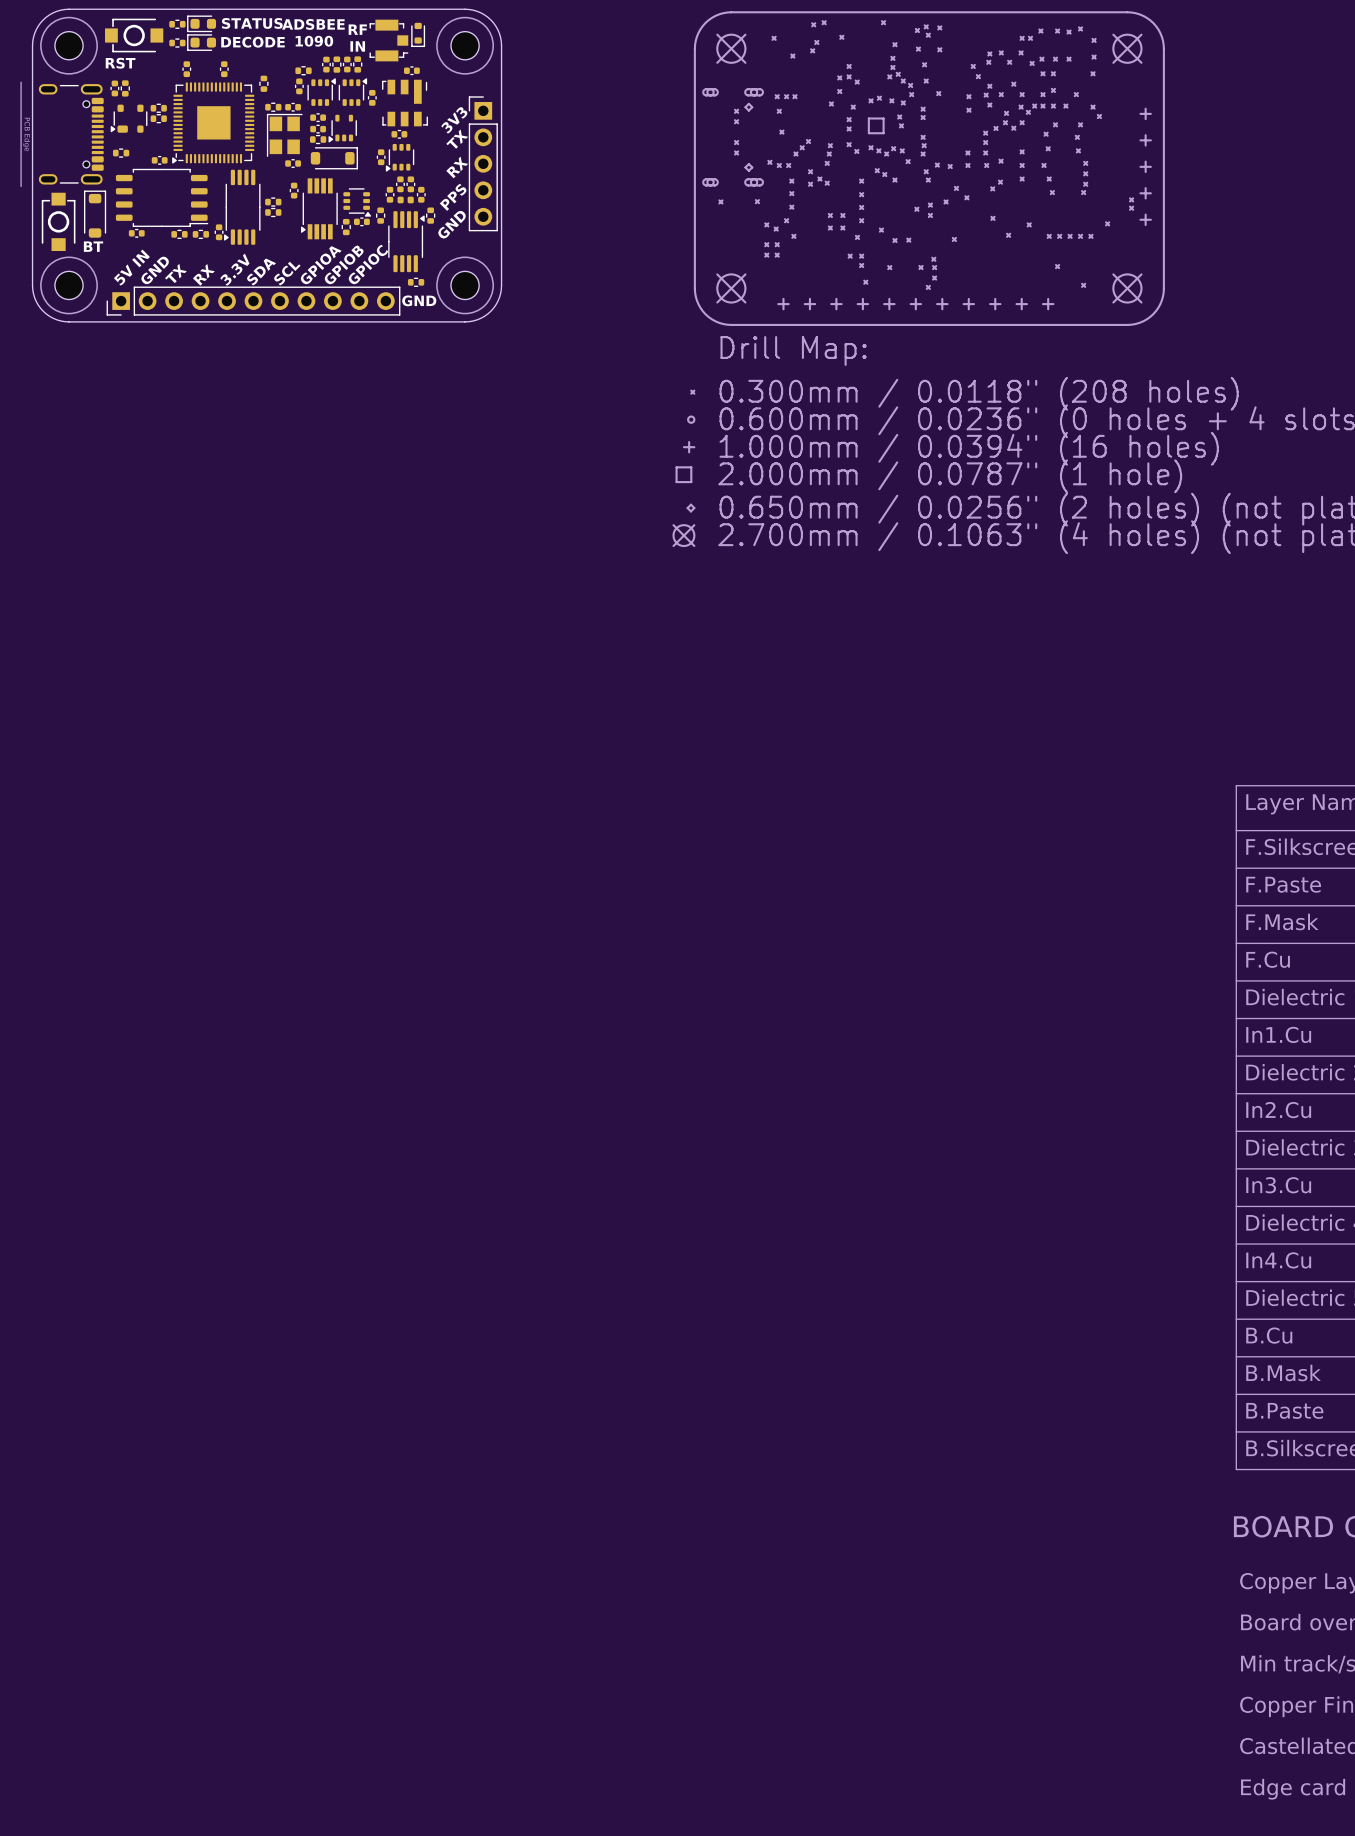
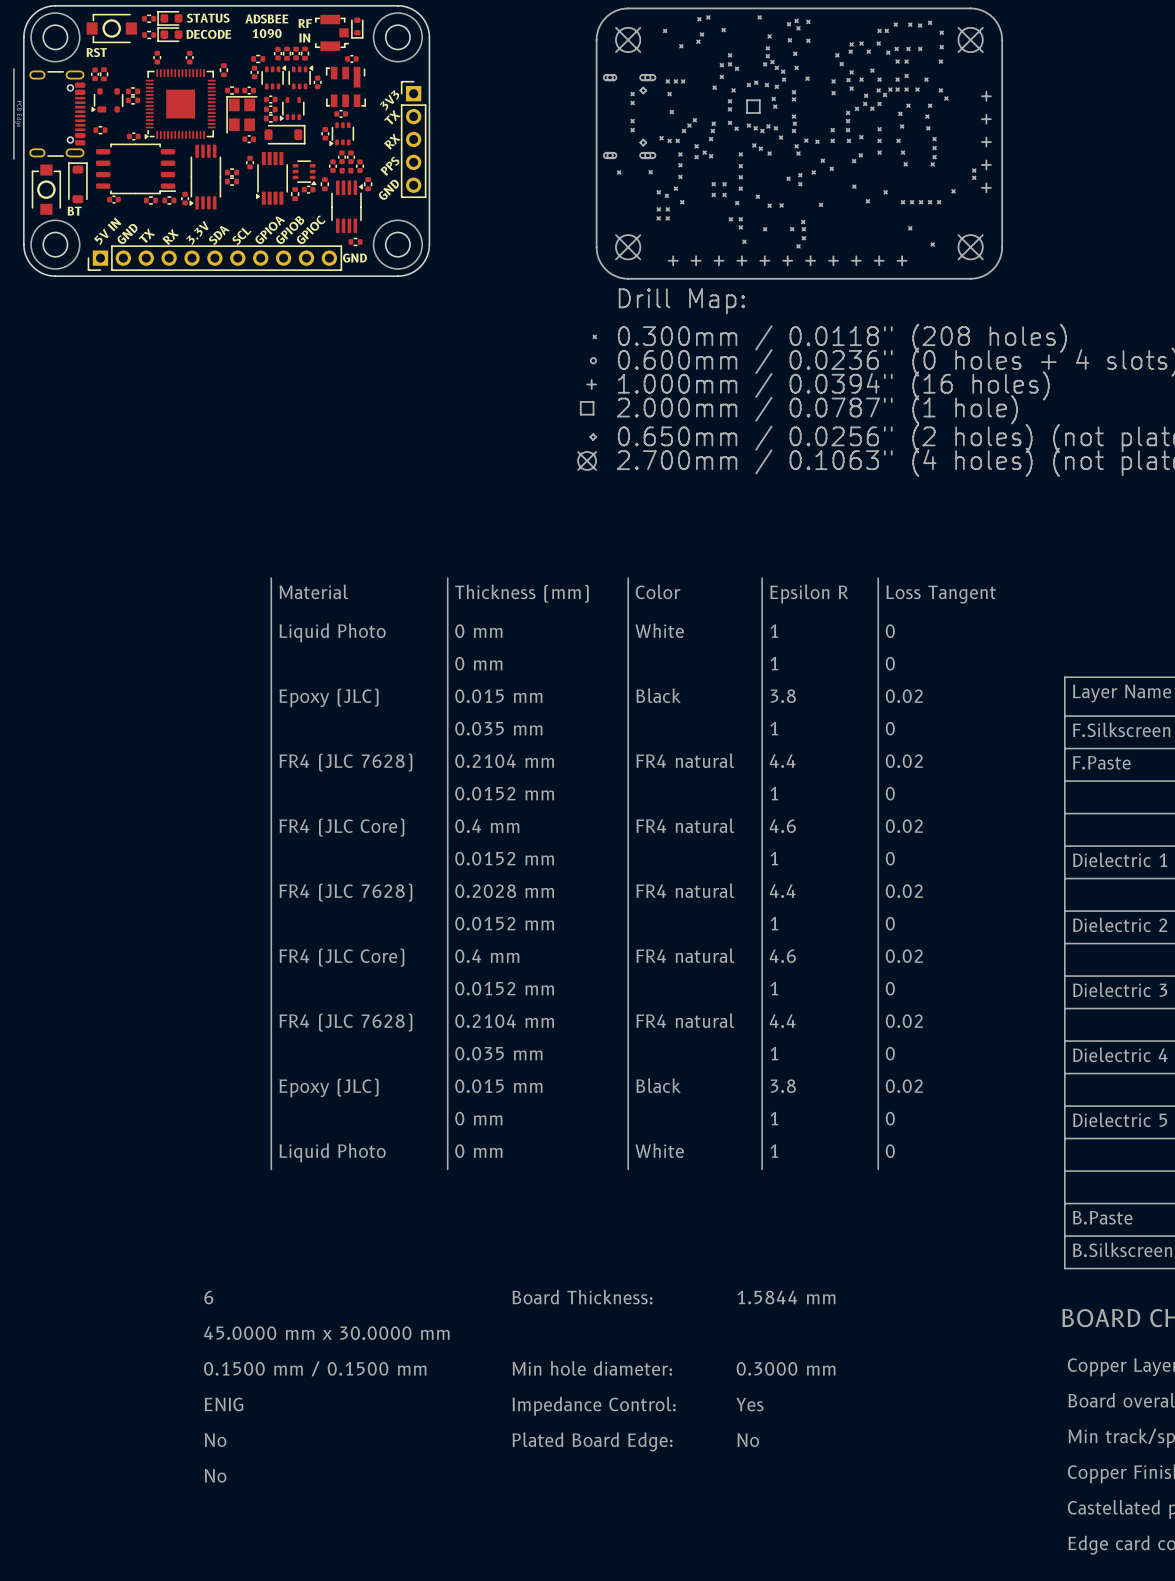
line: none -> (271, 578) (271, 1169)
line: none -> (447, 578) (447, 1169)
line: none -> (628, 578) (628, 1169)
line: none -> (762, 578) (762, 1169)
line: none -> (878, 578) (878, 1169)
text: none -> Material (313, 591)
text: none -> Color (658, 591)
text: none -> Thickness (mm) (521, 593)
text: none -> Epsilon R (809, 594)
text: none -> Loss Tangent (941, 594)
text: none -> 0 mm (478, 631)
text: none -> White (659, 630)
text: none -> 1 (774, 631)
text: none -> 0 (890, 631)
text: none -> Liquid Photo (332, 632)
text: none -> 0 mm (478, 663)
text: none -> 1 (774, 663)
text: none -> 0 (890, 663)
text: none -> 0.015 mm (498, 696)
text: none -> Black (658, 695)
text: none -> 3.8 (783, 696)
text: none -> 0.02 (904, 696)
text: none -> Epoxy (JLC) (329, 697)
text: none -> 0.035 mm (498, 728)
text: none -> 1 (774, 728)
text: none -> 0 (890, 728)
text: none -> 0.2104 mm (504, 761)
text: none -> FR4 natural (685, 760)
text: none -> 4.4 (782, 761)
text: none -> 0.02 (904, 761)
text: none -> FR4 (JLC 7628) (345, 762)
text: none -> 0.0152 mm (504, 793)
text: none -> 1 (774, 793)
text: none -> 0 (890, 793)
text: F.Mask (1282, 921) -> none
text: none -> 0.4 mm (487, 826)
text: none -> FR4 natural (685, 825)
text: none -> 4.6 (782, 826)
text: none -> 0.02 (904, 826)
text: none -> FR4 (JLC Core) (341, 827)
text: F.Cu (1268, 959) -> none
text: none -> 0.0152 mm (504, 858)
text: none -> 1 (774, 858)
text: none -> 0 (890, 858)
text: none -> FR4 natural (685, 890)
text: none -> 0.2028 mm (504, 891)
text: none -> 4.4 (782, 891)
text: none -> 0.02 (904, 891)
text: none -> FR4 (JLC 7628) (345, 892)
text: In1.Cu (1278, 1034) -> none
text: none -> 0.0152 mm (504, 923)
text: none -> 1 (774, 923)
text: none -> 0 (890, 923)
text: none -> 0.4 mm (487, 956)
text: none -> FR4 natural (685, 955)
text: none -> 4.6 (782, 956)
text: none -> 0.02 (904, 956)
text: none -> FR4 (JLC Core) (341, 957)
text: In2.Cu (1278, 1110) -> none
text: none -> 0.0152 mm (504, 988)
text: none -> 1 (774, 988)
text: none -> 0 (890, 988)
text: none -> 0.2104 mm (504, 1021)
text: none -> FR4 natural (685, 1020)
text: none -> 4.4 (782, 1021)
text: none -> 0.02 (904, 1021)
text: none -> FR4 (JLC 7628) (345, 1022)
text: In3.Cu (1278, 1185) -> none
text: none -> 0.035 mm (498, 1053)
text: none -> 1 (774, 1053)
text: none -> 0 (890, 1053)
text: none -> 0.015 mm (498, 1086)
text: none -> Black (658, 1085)
text: none -> 3.8 (783, 1086)
text: none -> 0.02 (904, 1086)
text: none -> Epoxy (JLC) (329, 1087)
text: In4.Cu (1278, 1260) -> none
text: none -> 0 mm (478, 1118)
text: none -> 1 (774, 1118)
text: none -> 0 (890, 1118)
text: none -> 0 mm (478, 1151)
text: none -> White (659, 1150)
text: none -> 1 (774, 1151)
text: none -> 0 (890, 1151)
text: none -> Liquid Photo (332, 1152)
text: B.Cu (1269, 1335) -> none
text: B.Mask (1283, 1372) -> none
text: none -> 6 (208, 1297)
text: none -> Board Thickness: (582, 1297)
text: none -> 1.5844 mm (786, 1297)
text: none -> 45.0000 mm x 30.0000 mm (326, 1333)
text: none -> Min hole diameter: (592, 1368)
text: none -> 0.3000 mm (786, 1368)
text: none -> 0.1500 mm / 0.1500 mm (315, 1368)
text: none -> ENIG (223, 1404)
text: none -> Yes (749, 1404)
text: none -> Impedance Control: (594, 1406)
text: none -> No (215, 1440)
text: none -> No (748, 1440)
text: none -> Plated Board Edge: (592, 1441)
text: none -> No (215, 1475)

